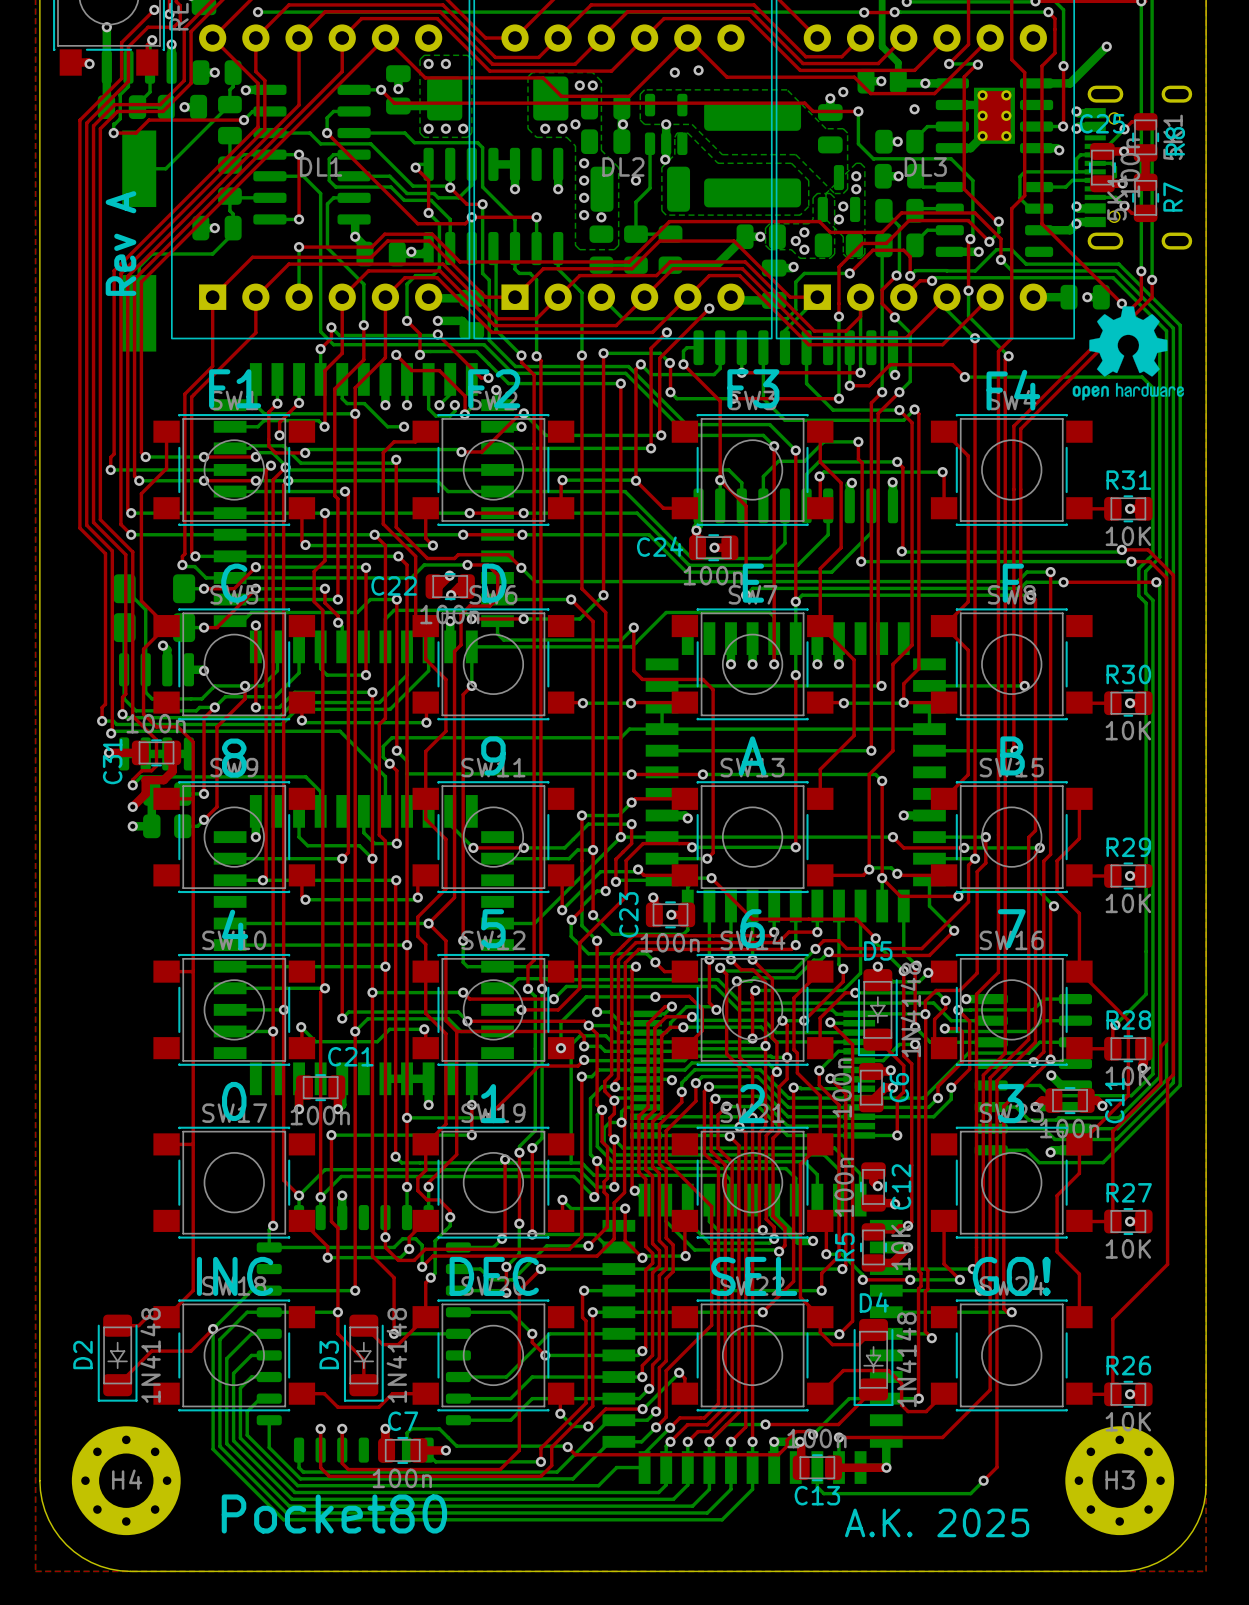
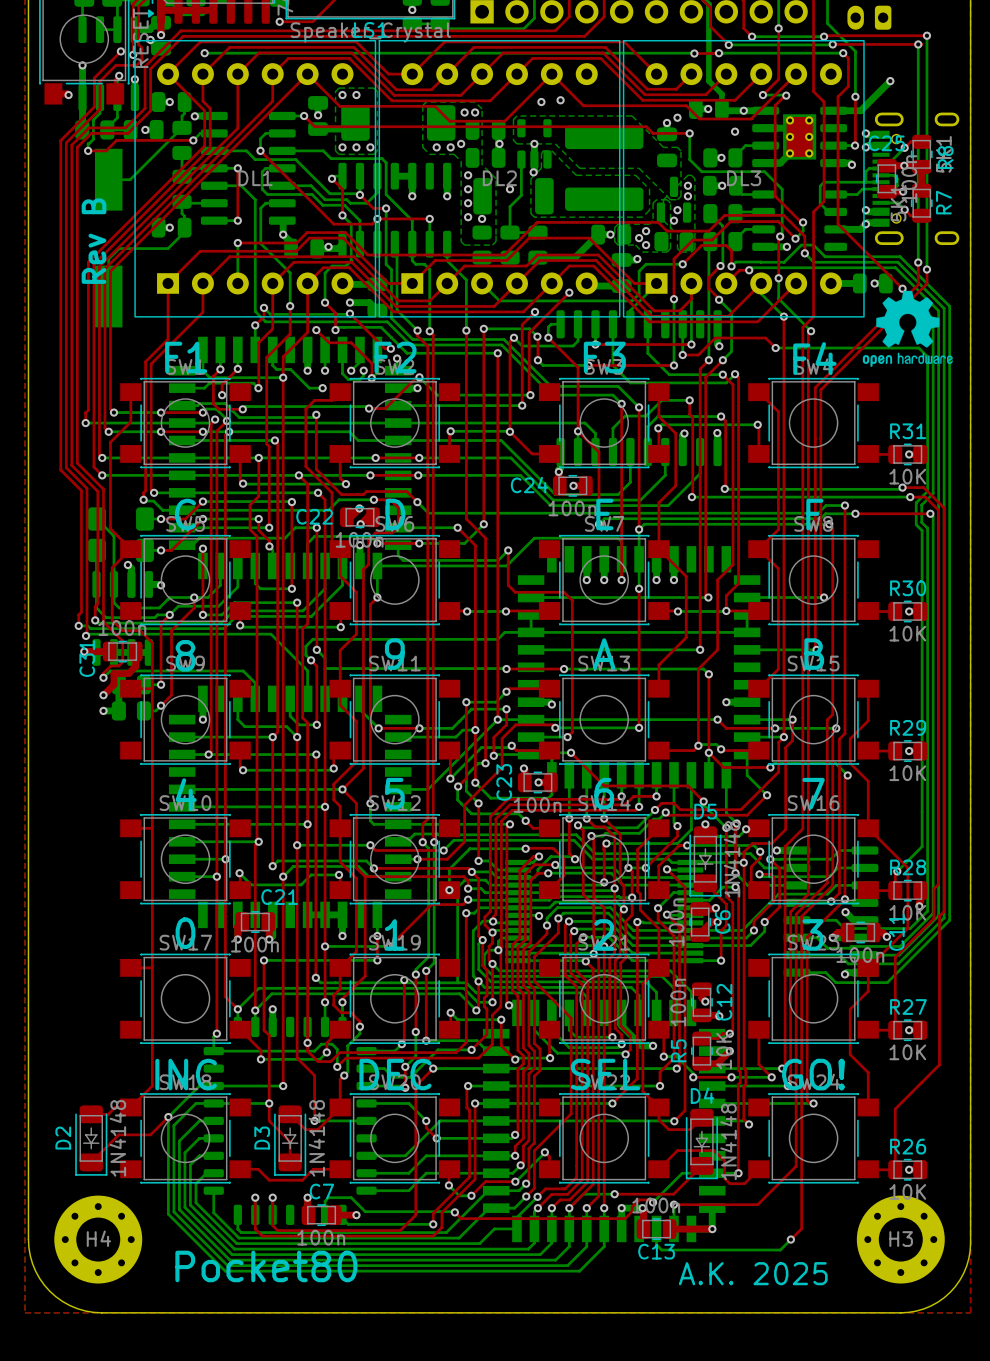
text: Rev A (121, 243) -> Rev B (93, 241)

